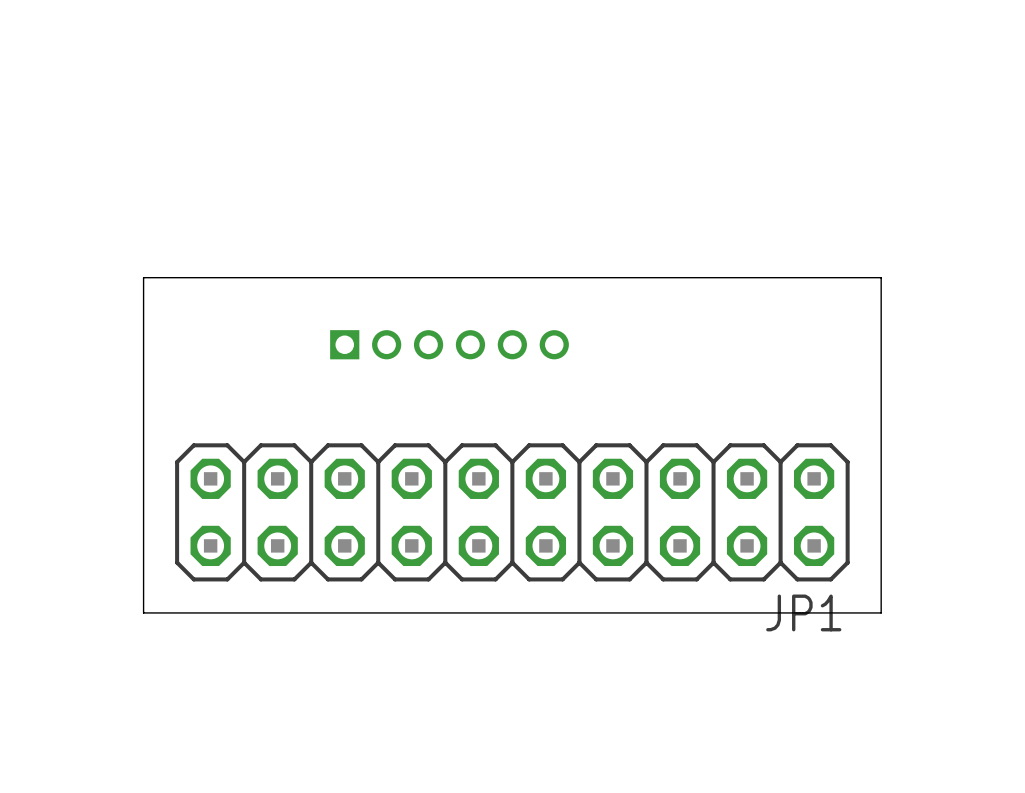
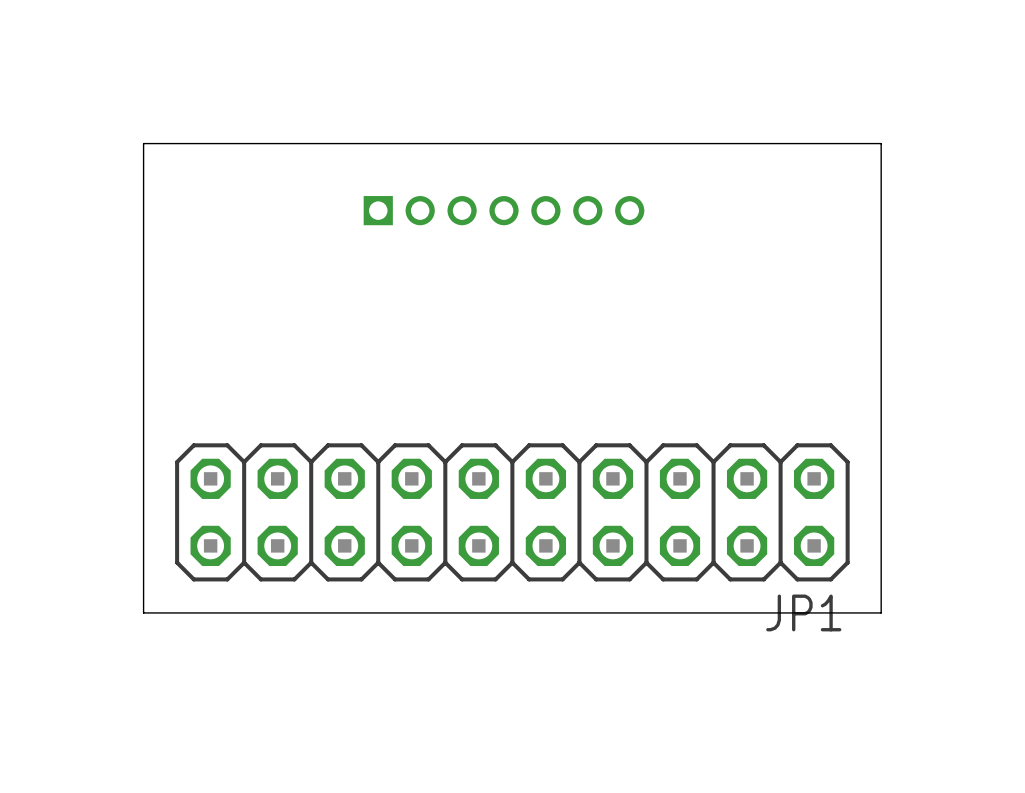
part: none -> (503, 210)
board edge: (881, 277) (143, 277) -> (881, 277) (881, 143) (143, 143) (143, 277)
part: (449, 344) -> none

